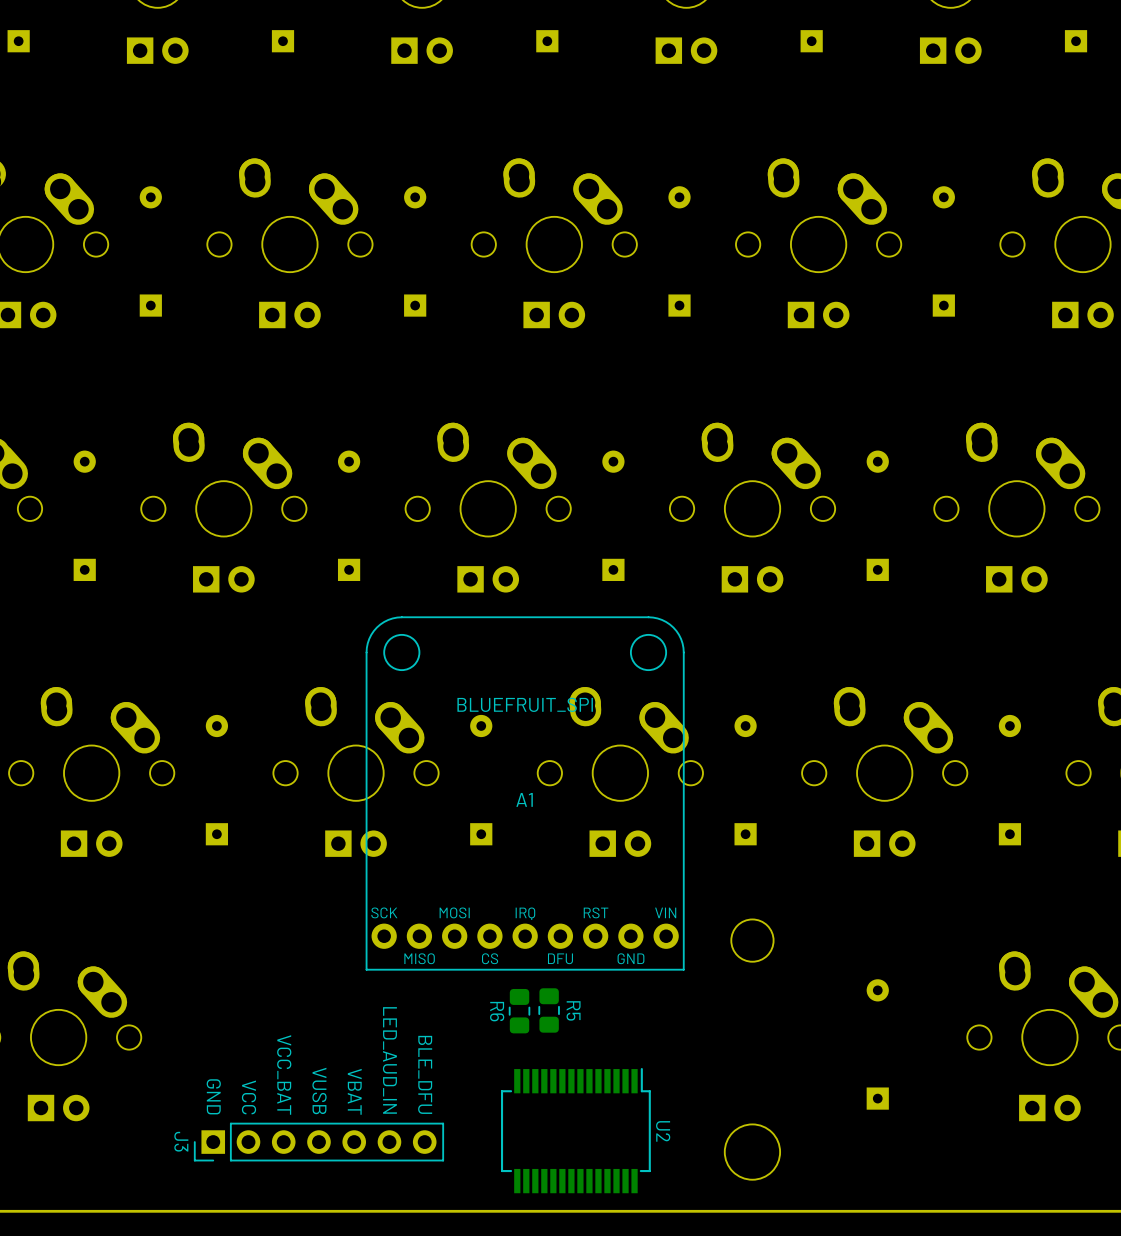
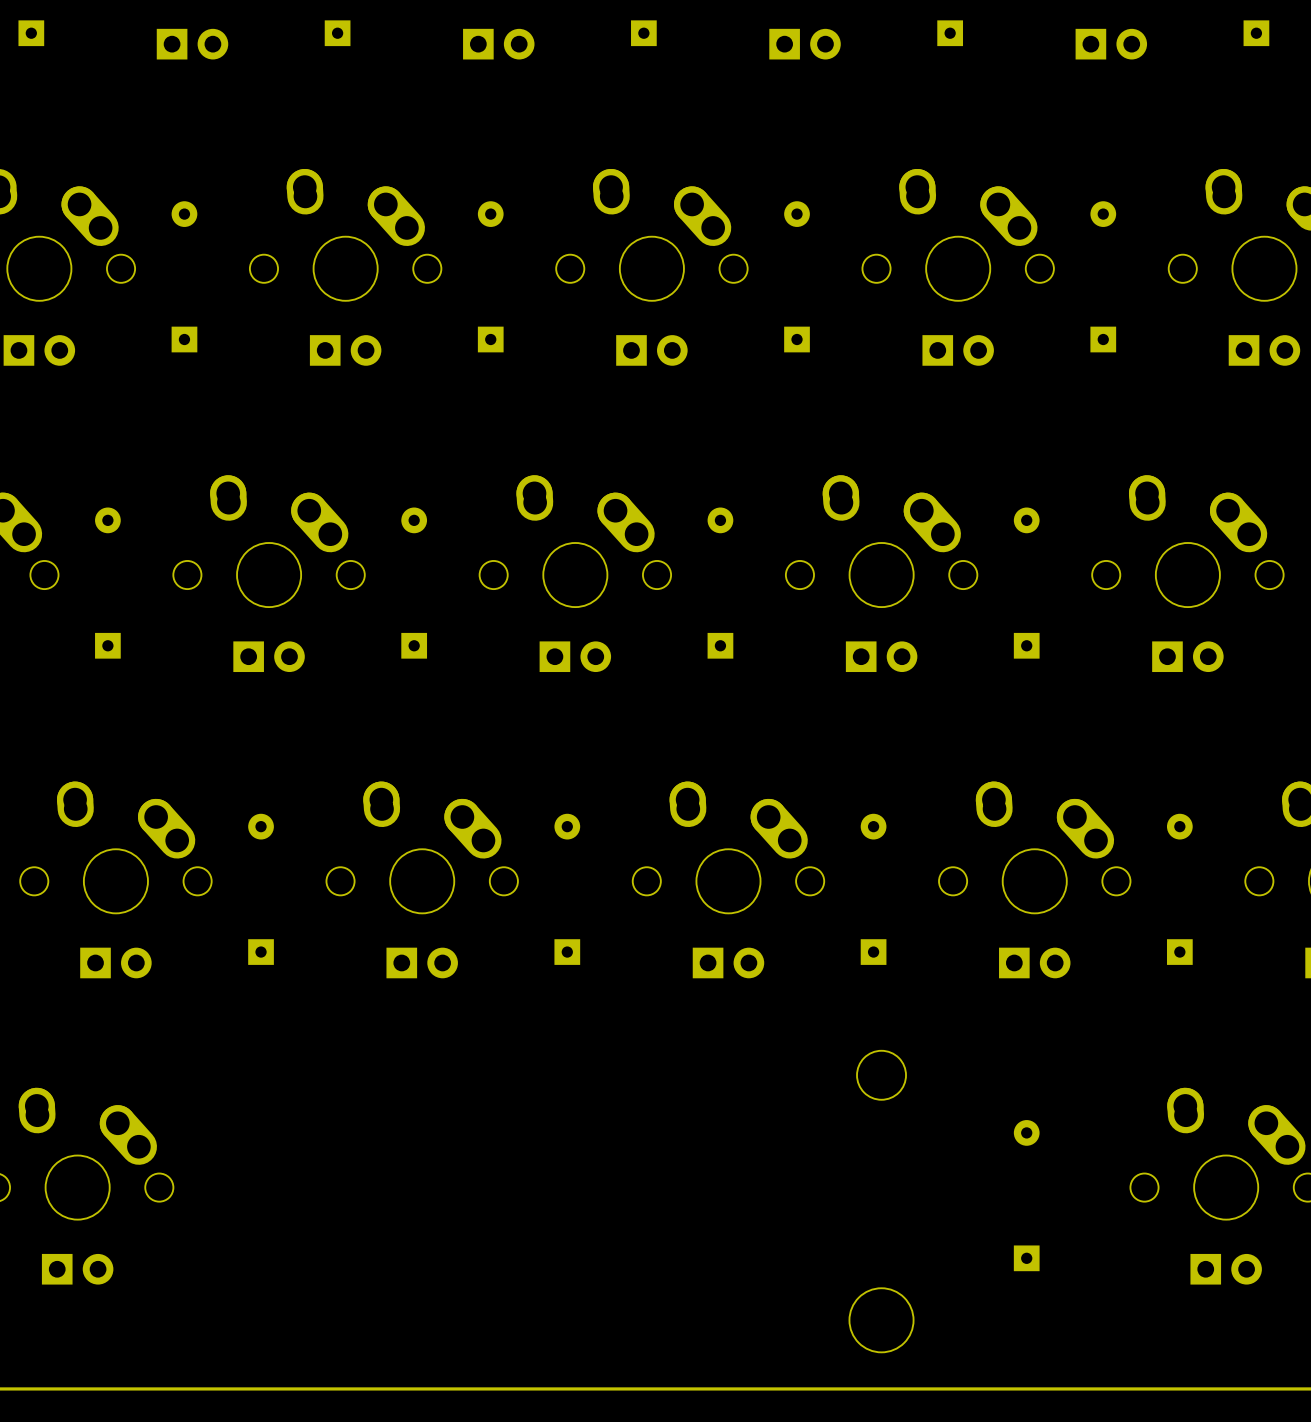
A1: BLUEFRUIT_SPI (525, 793) -> none
R5: (549, 1010) -> none
R6: (519, 1011) -> none
text: LED_AUD_IN (389, 1060) -> none
text: BLE_DFU (425, 1074) -> none
text: VCC_BAT (284, 1075) -> none
text: VUSB (319, 1091) -> none
text: VBAT (354, 1091) -> none
text: GND (213, 1096) -> none
text: VCC (248, 1097) -> none
U2: (575, 1130) -> none
J3: (318, 1142) -> none

